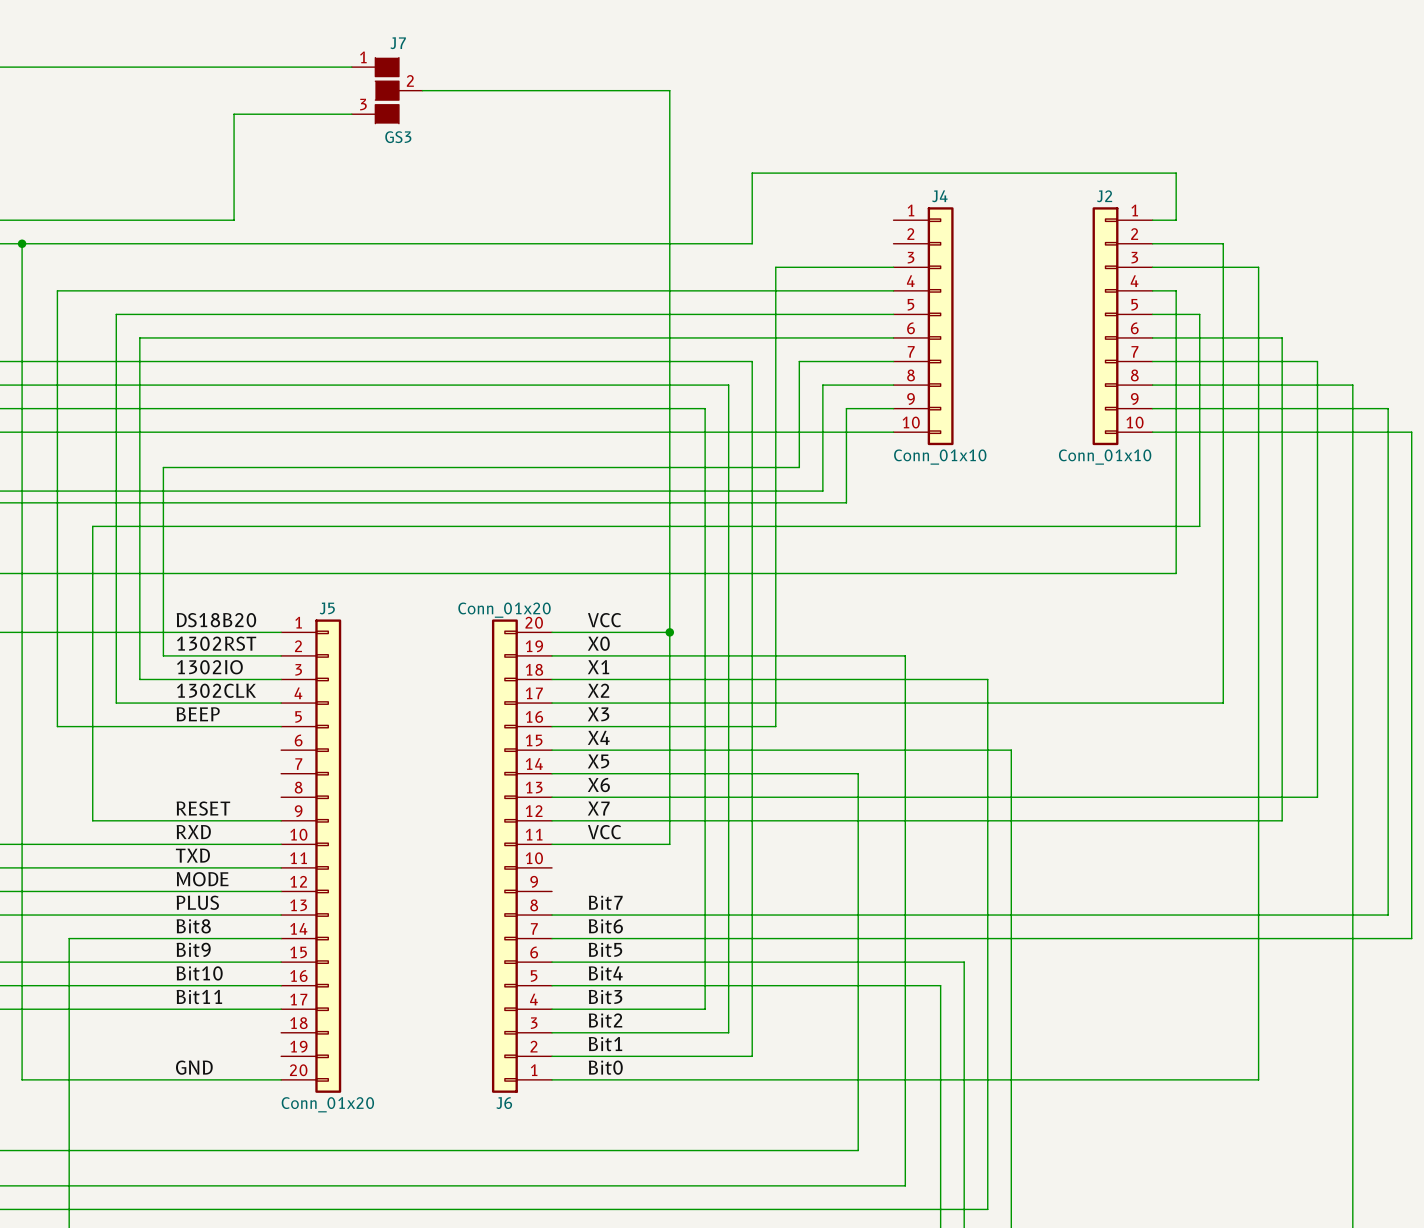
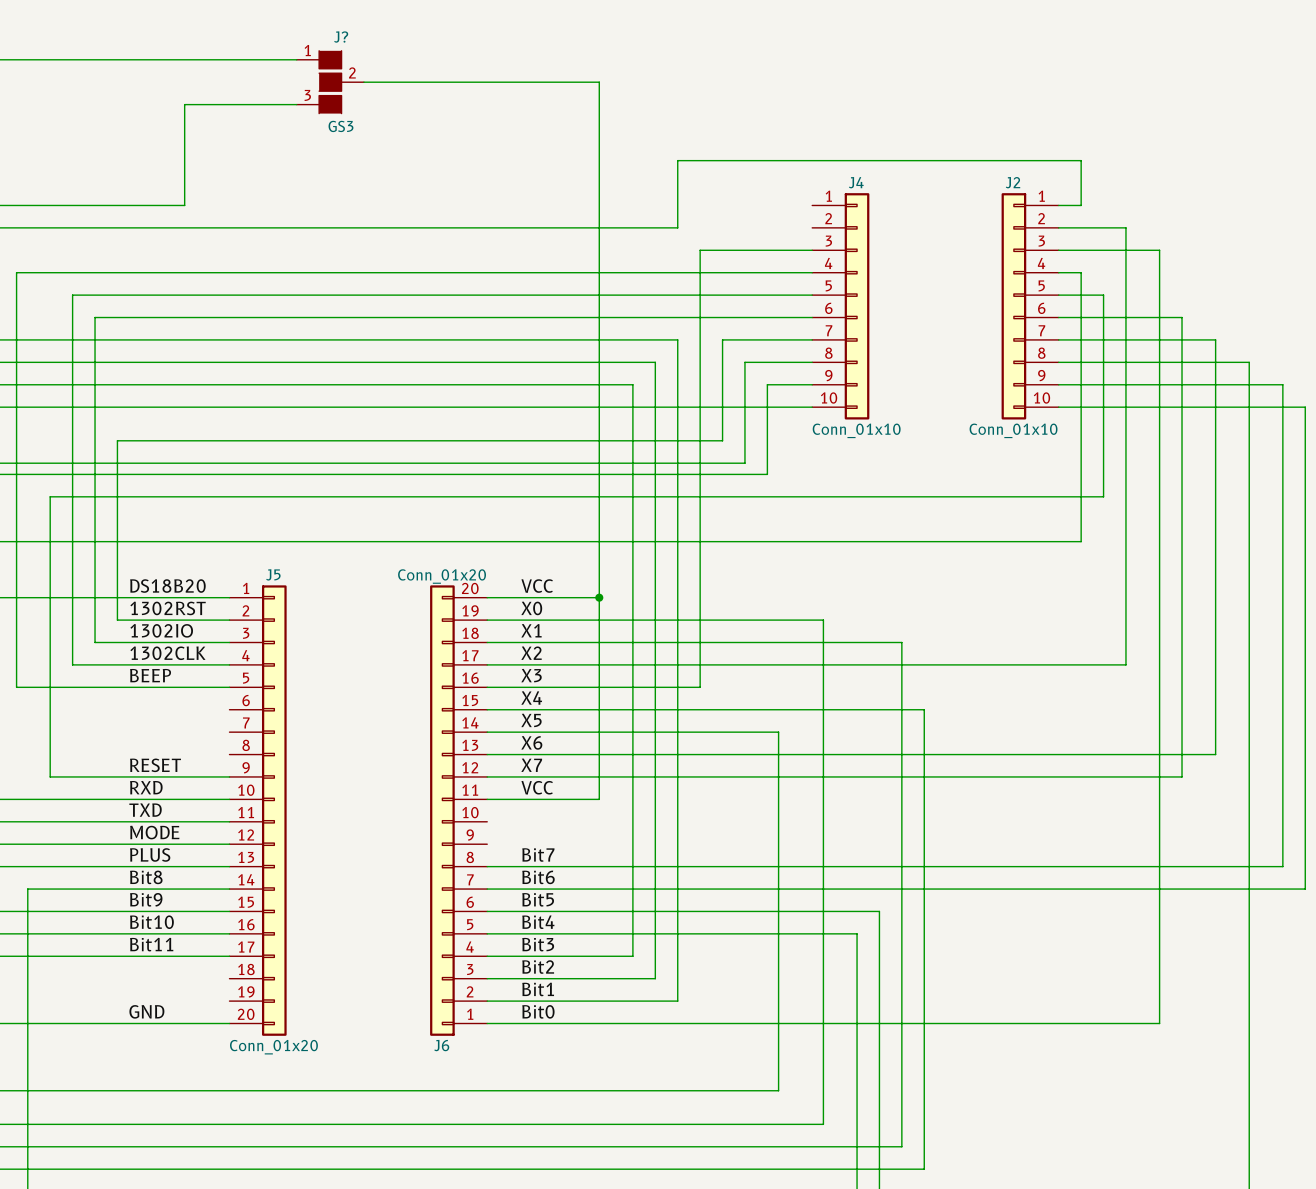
J7 name: J7 (398, 43) -> J? (341, 37)

